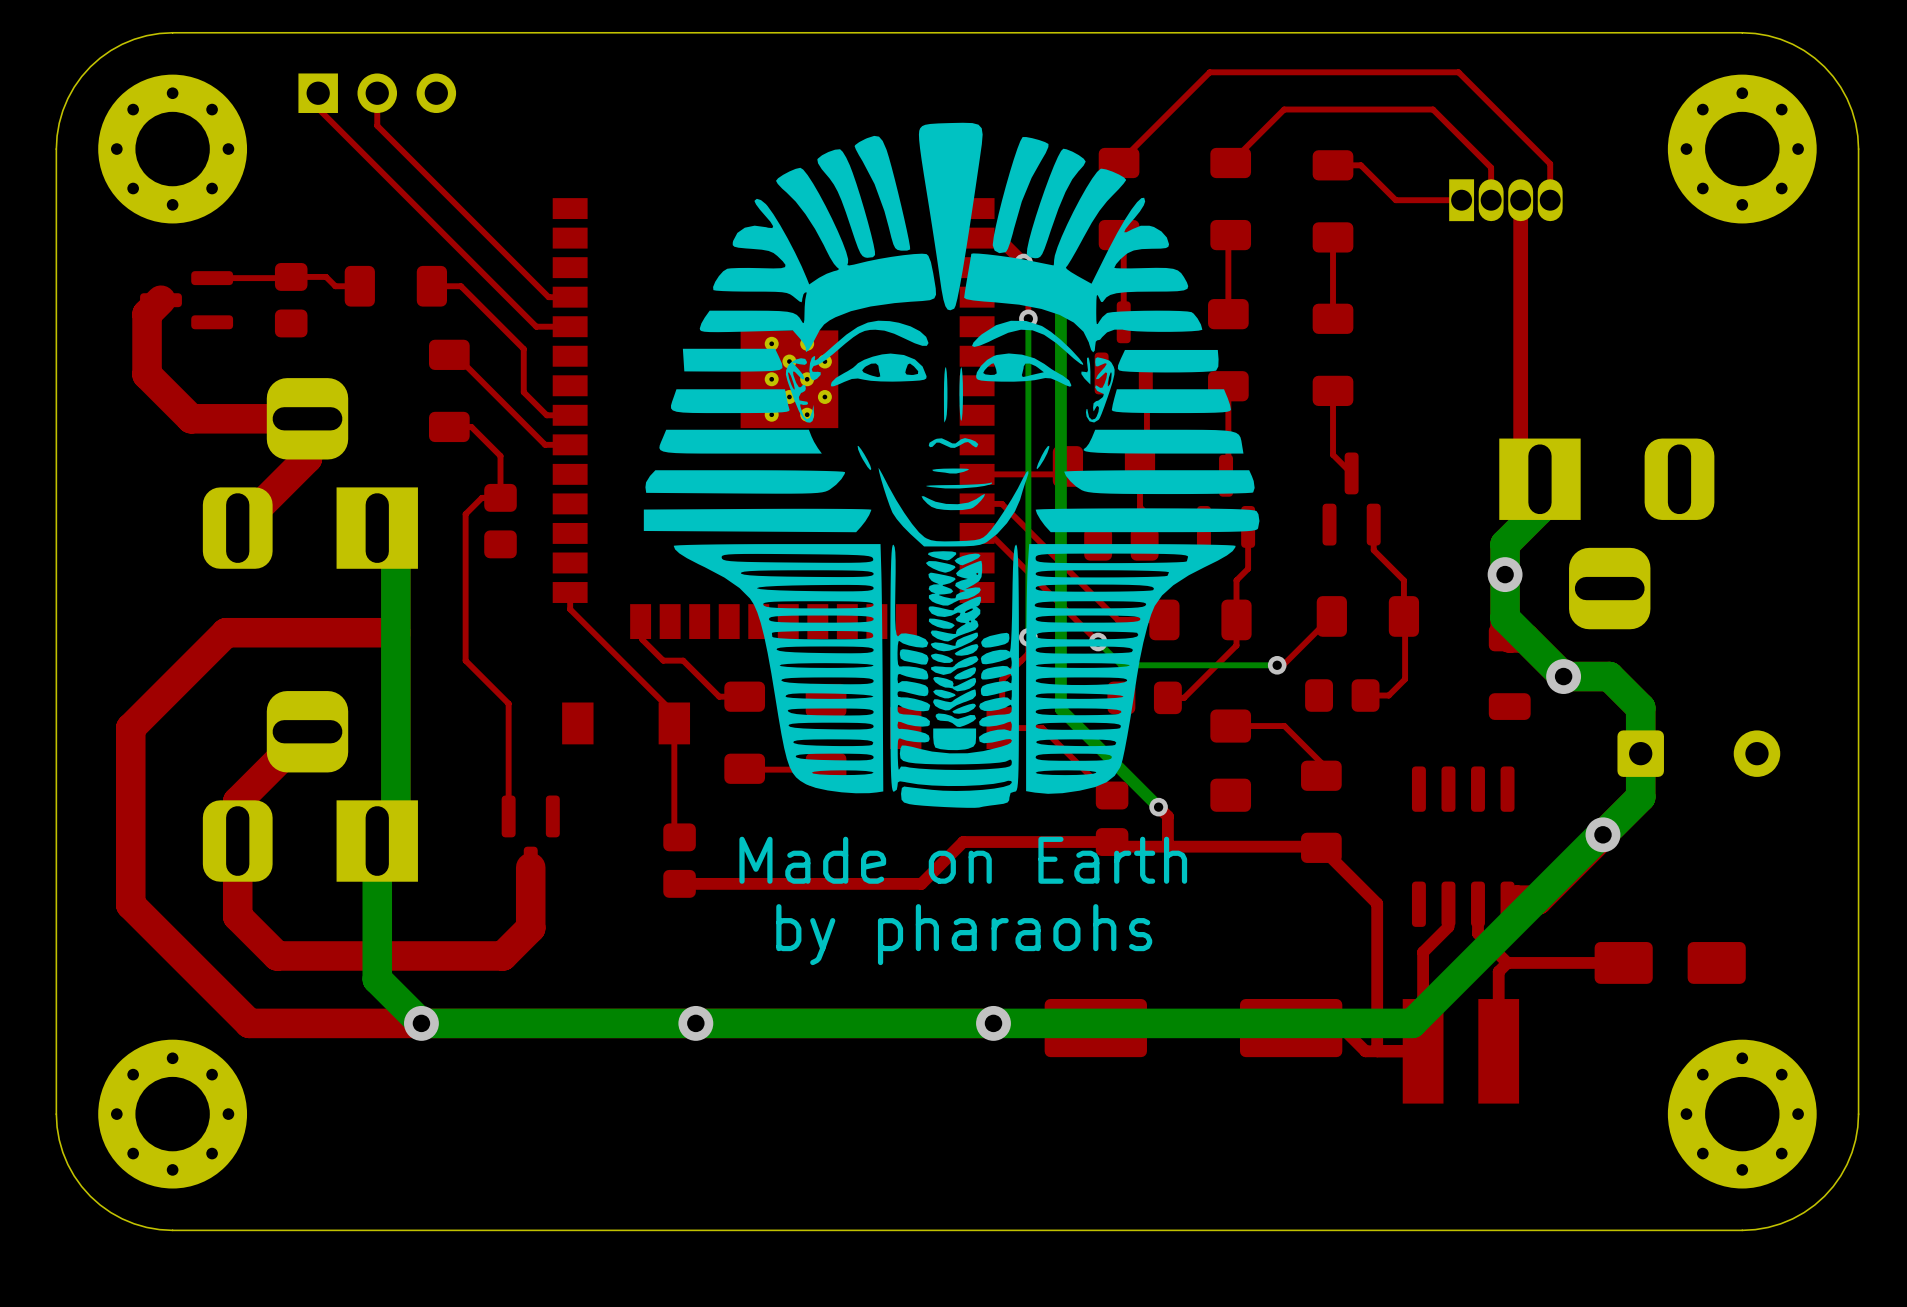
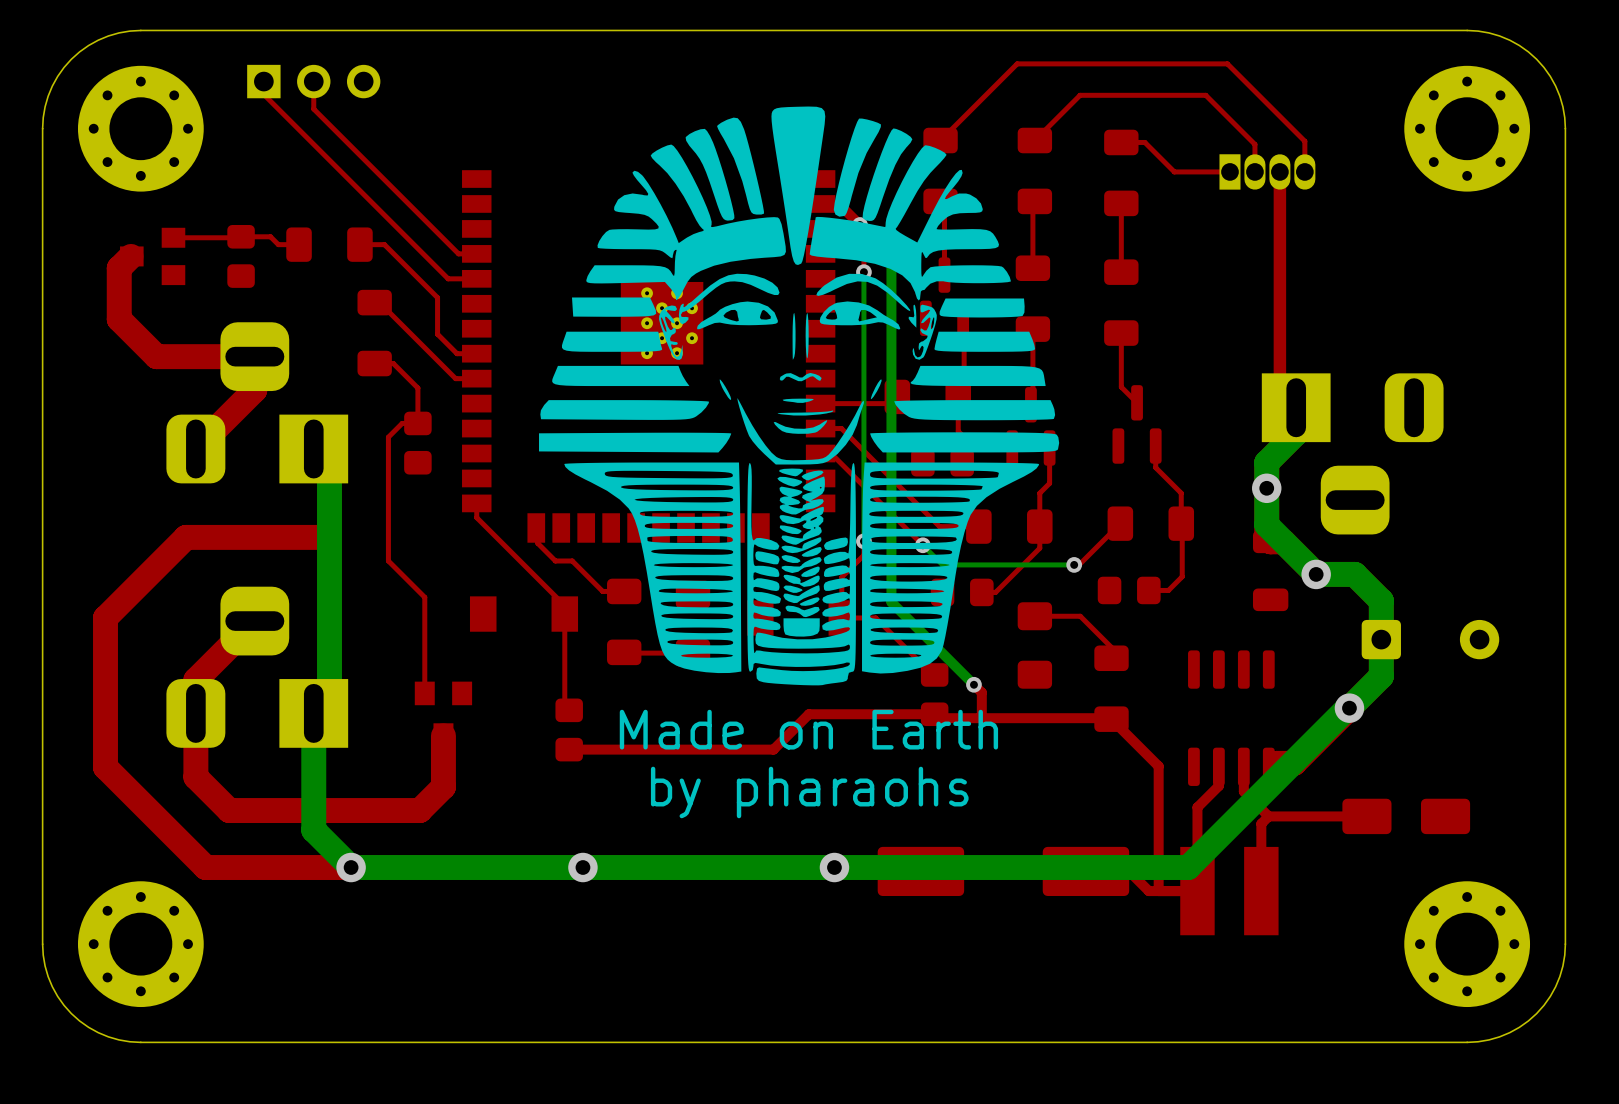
part footprint: [140, 271, 234, 330] -> [120, 227, 186, 286]
part footprint: [501, 795, 560, 889] -> [414, 681, 473, 747]

